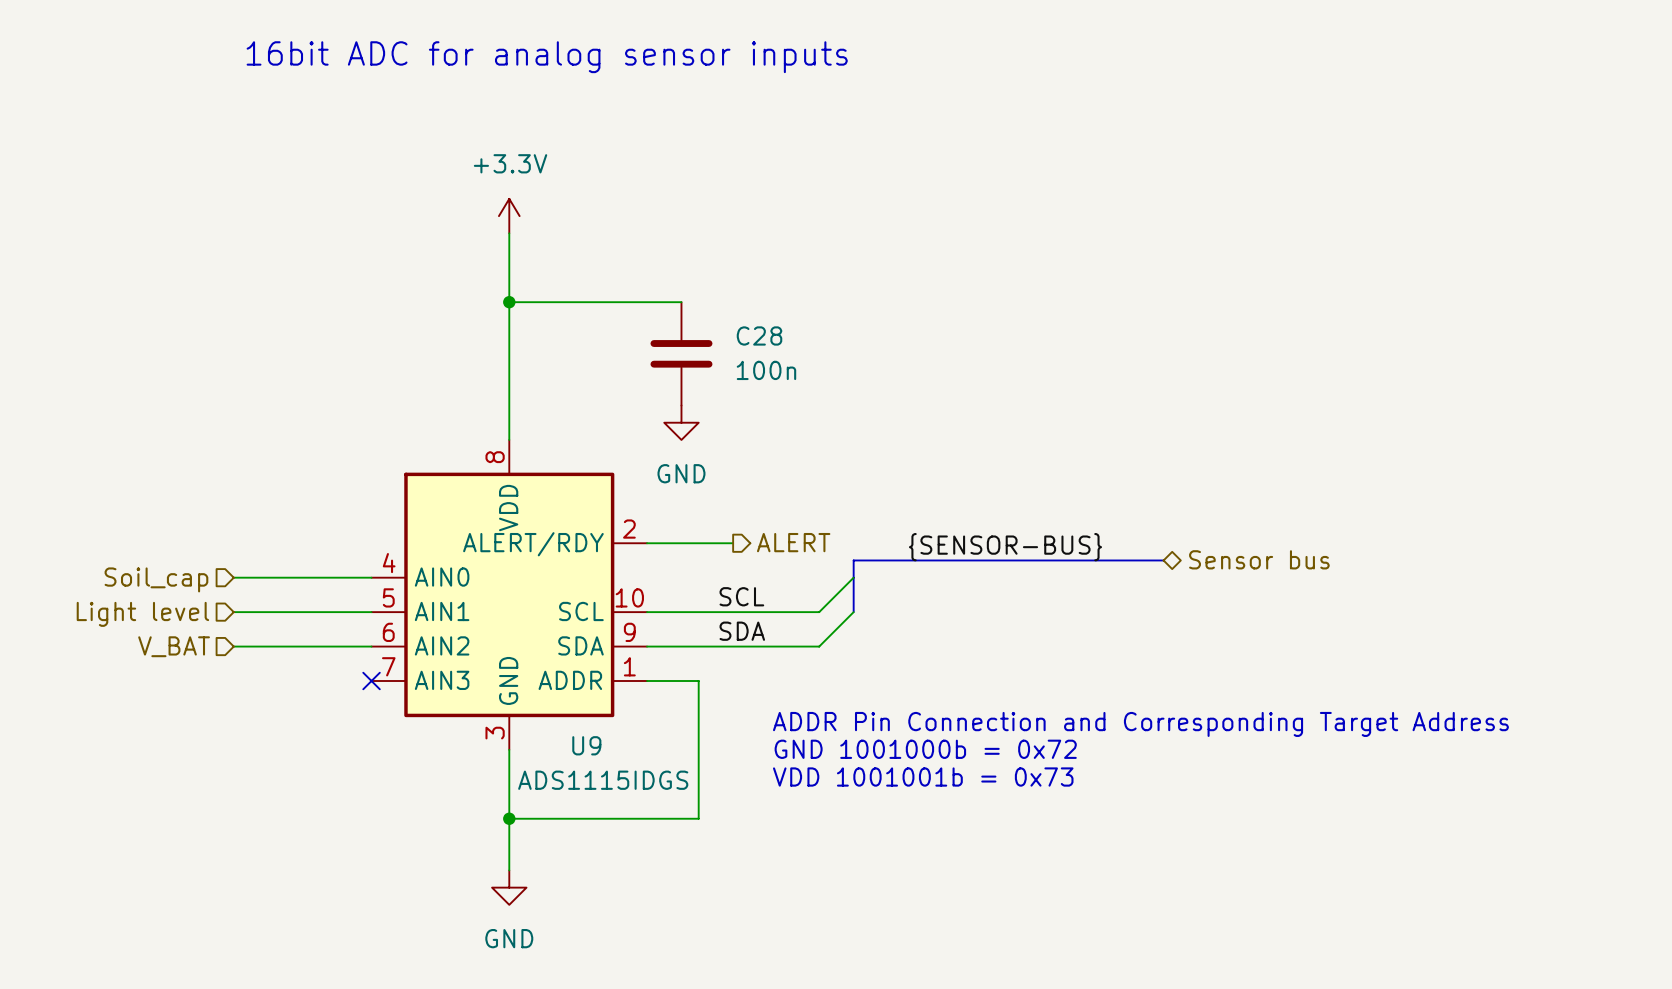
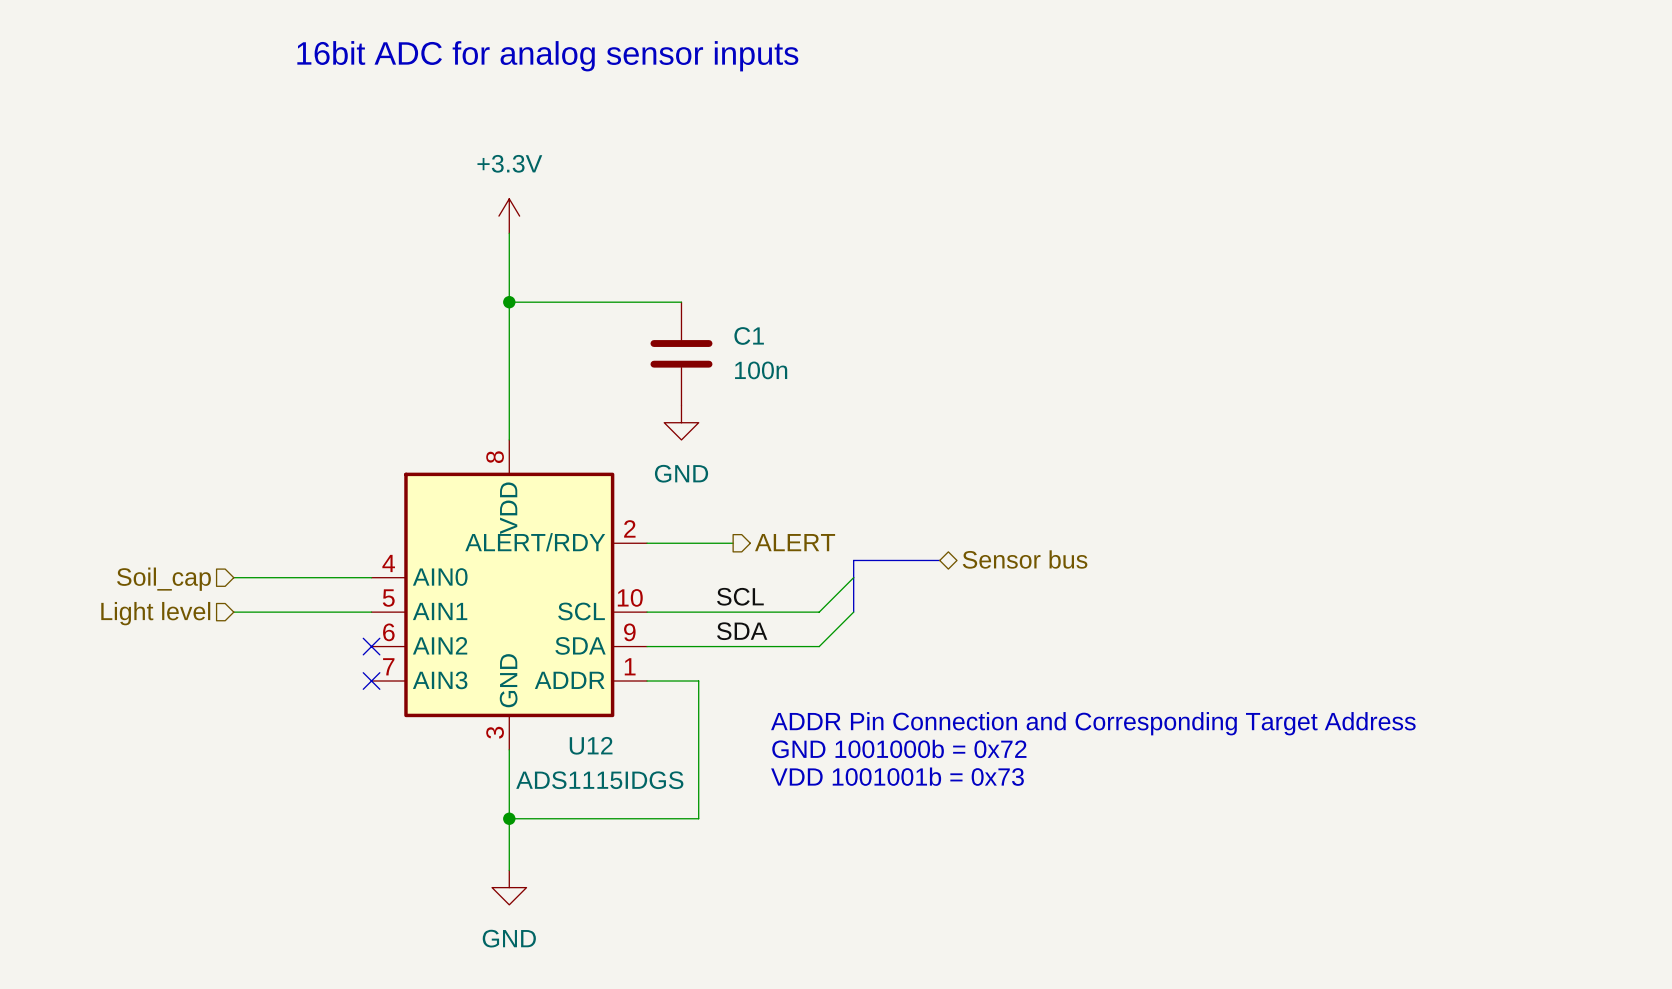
C28 name: C28 (759, 335) -> C1 (749, 335)
label: {SENSOR-BUS} (1005, 547) -> none
hierarchical label position: Sensor bus (1259, 559) -> Sensor bus (1025, 559)
bus: (939, 560) (1163, 560) -> none
hierarchical label: V_BAT (174, 646) -> none
wire: (233, 646) (371, 646) -> none
no-connect mark: none -> (371, 646)
U9 name: U9 (586, 745) -> U12 (591, 745)

